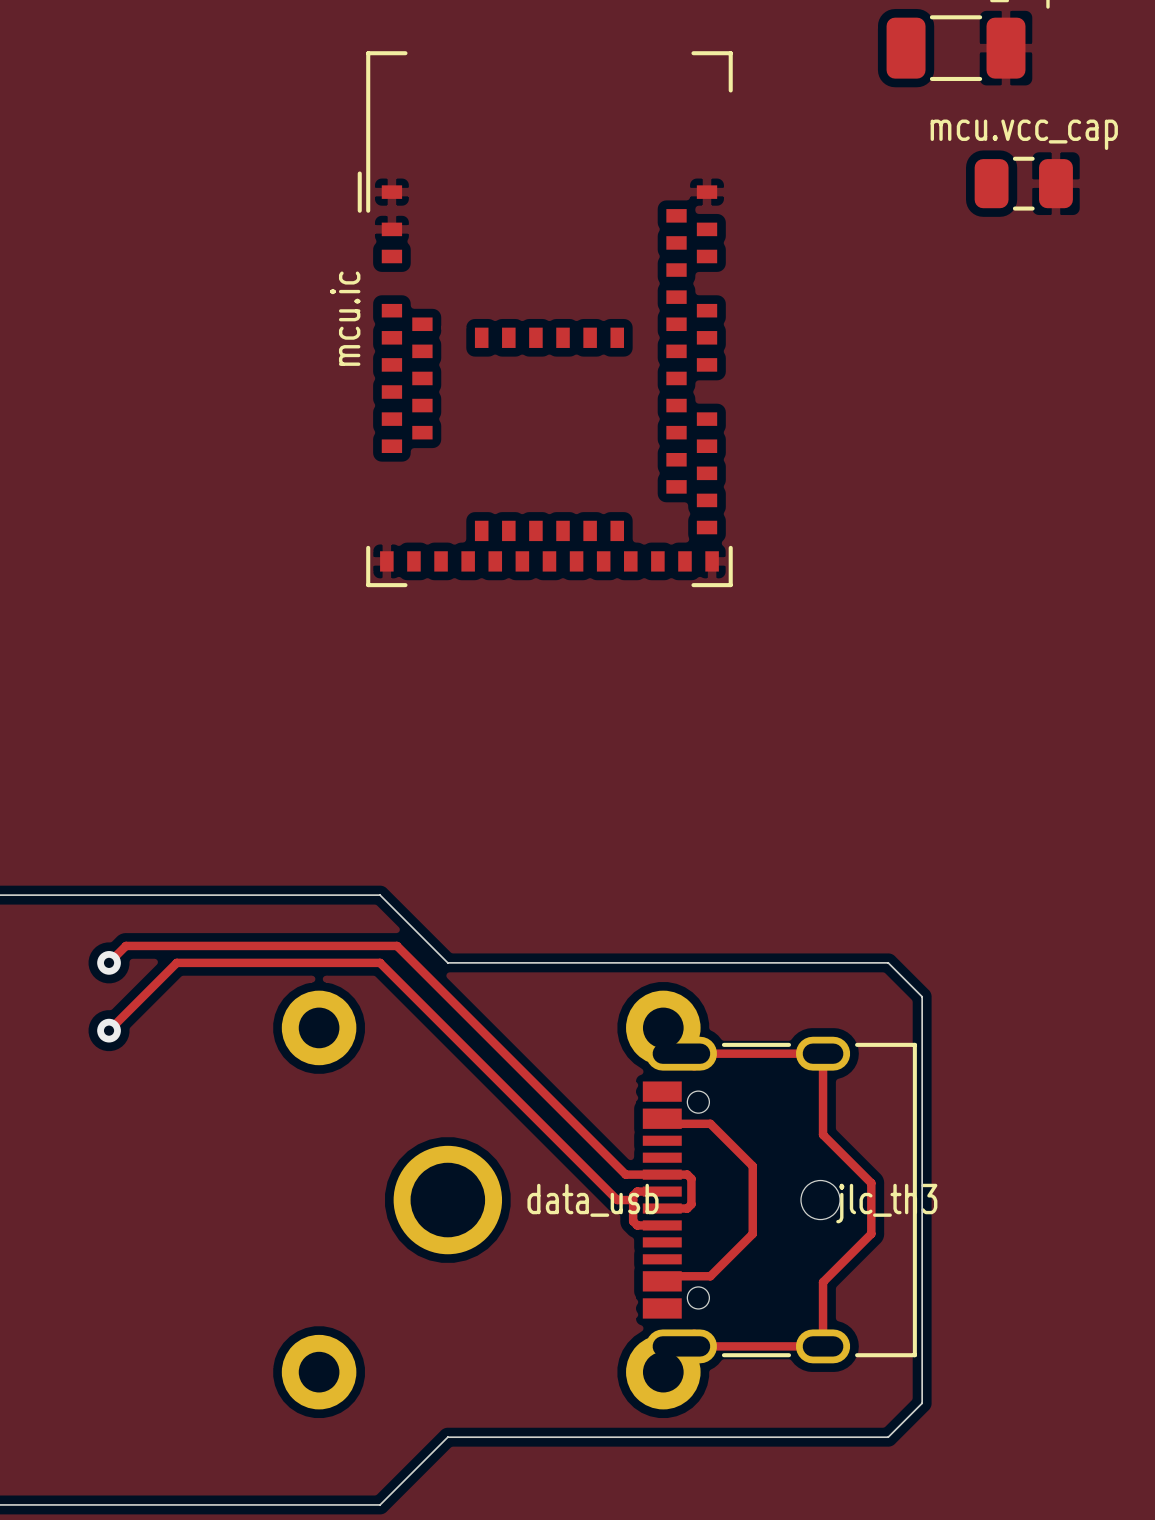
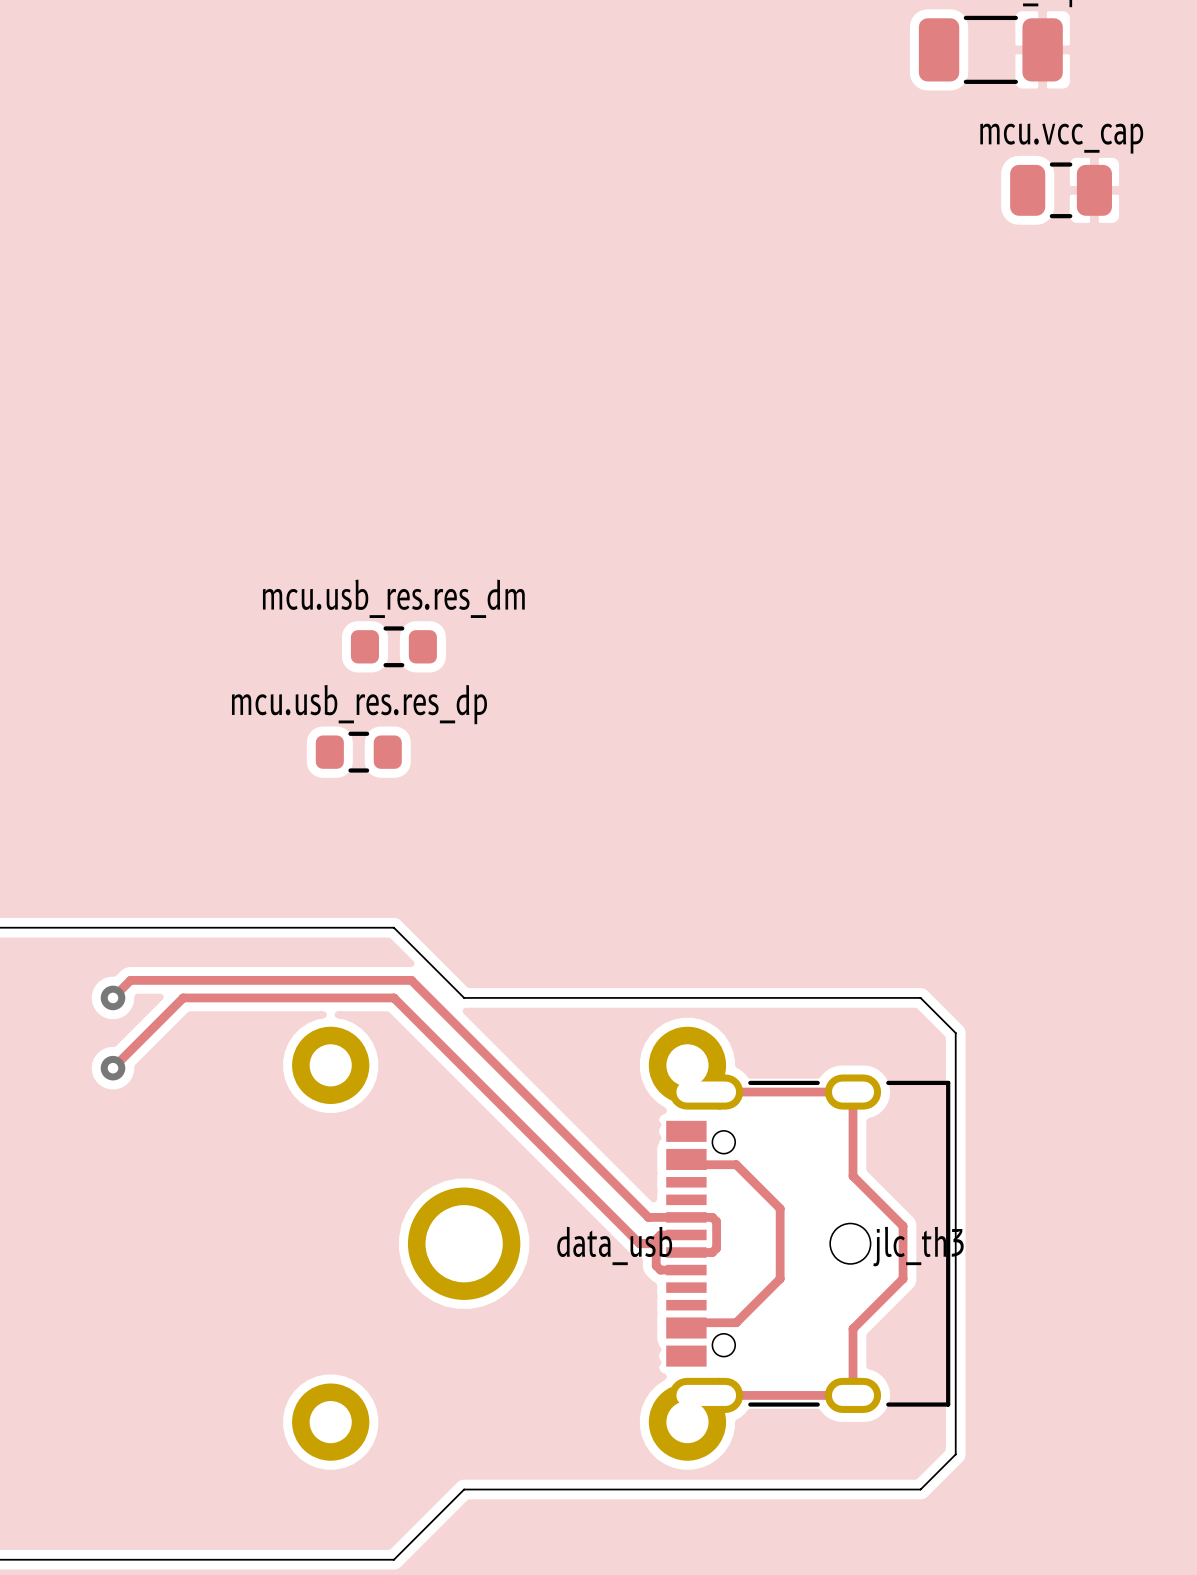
mcu.ic: (545, 319) -> none
mcu.usb_res.res_dm: none -> (393, 646)
mcu.usb_res.res_dp: none -> (358, 752)

